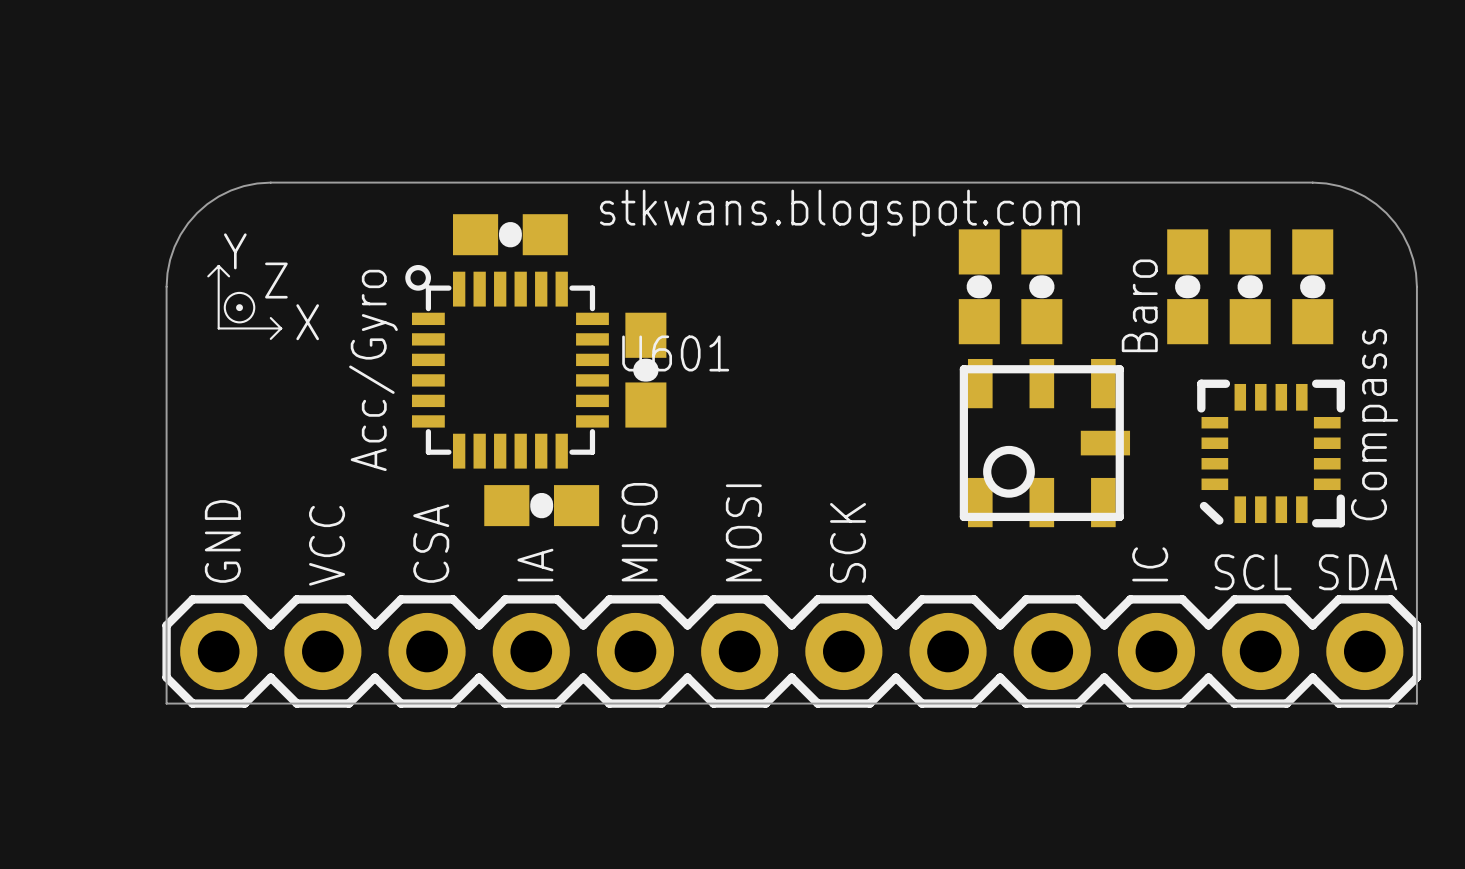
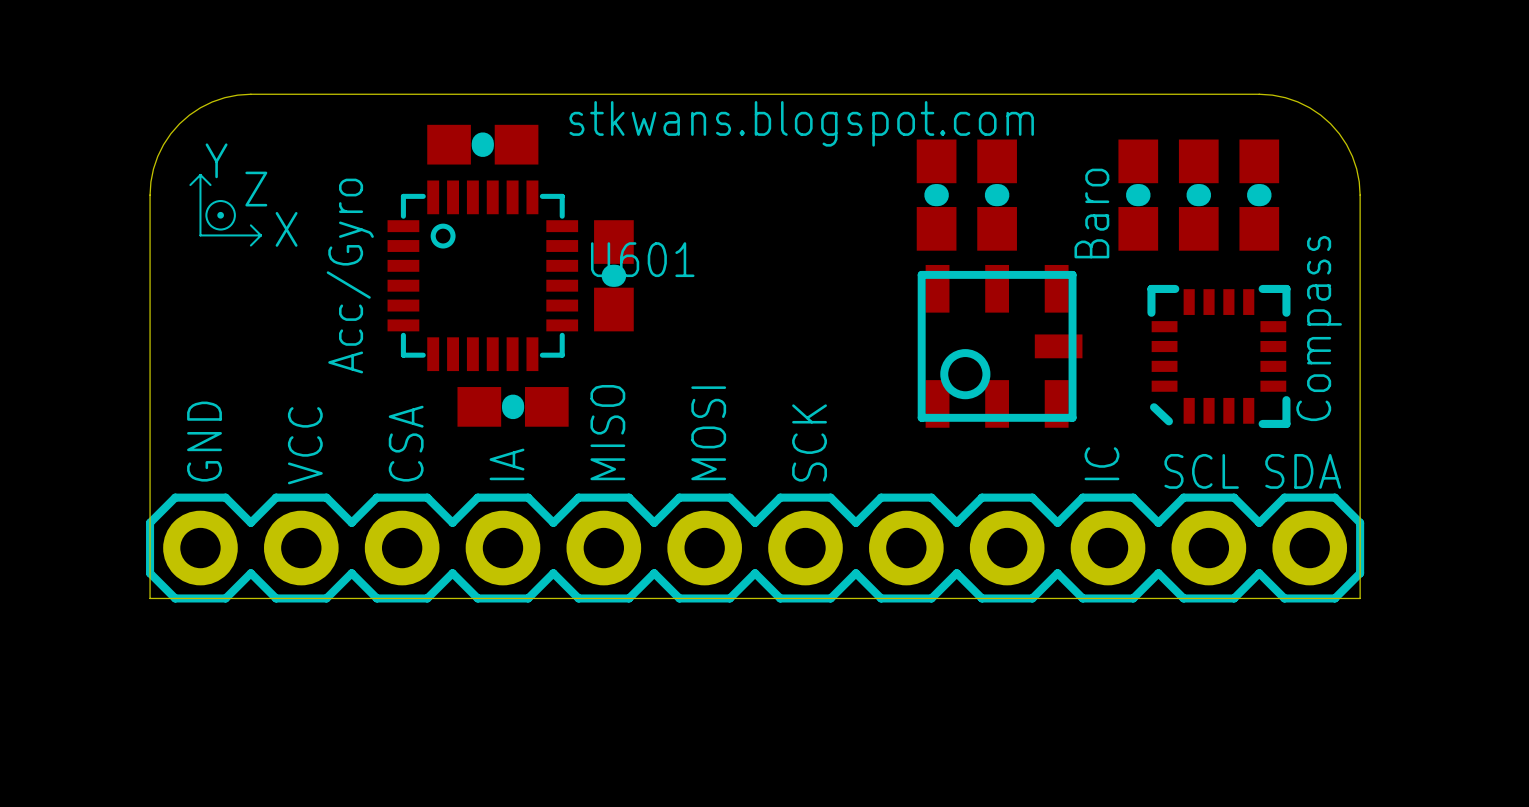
U601 footprint: [405, 264, 609, 469] -> [387, 180, 579, 372]

